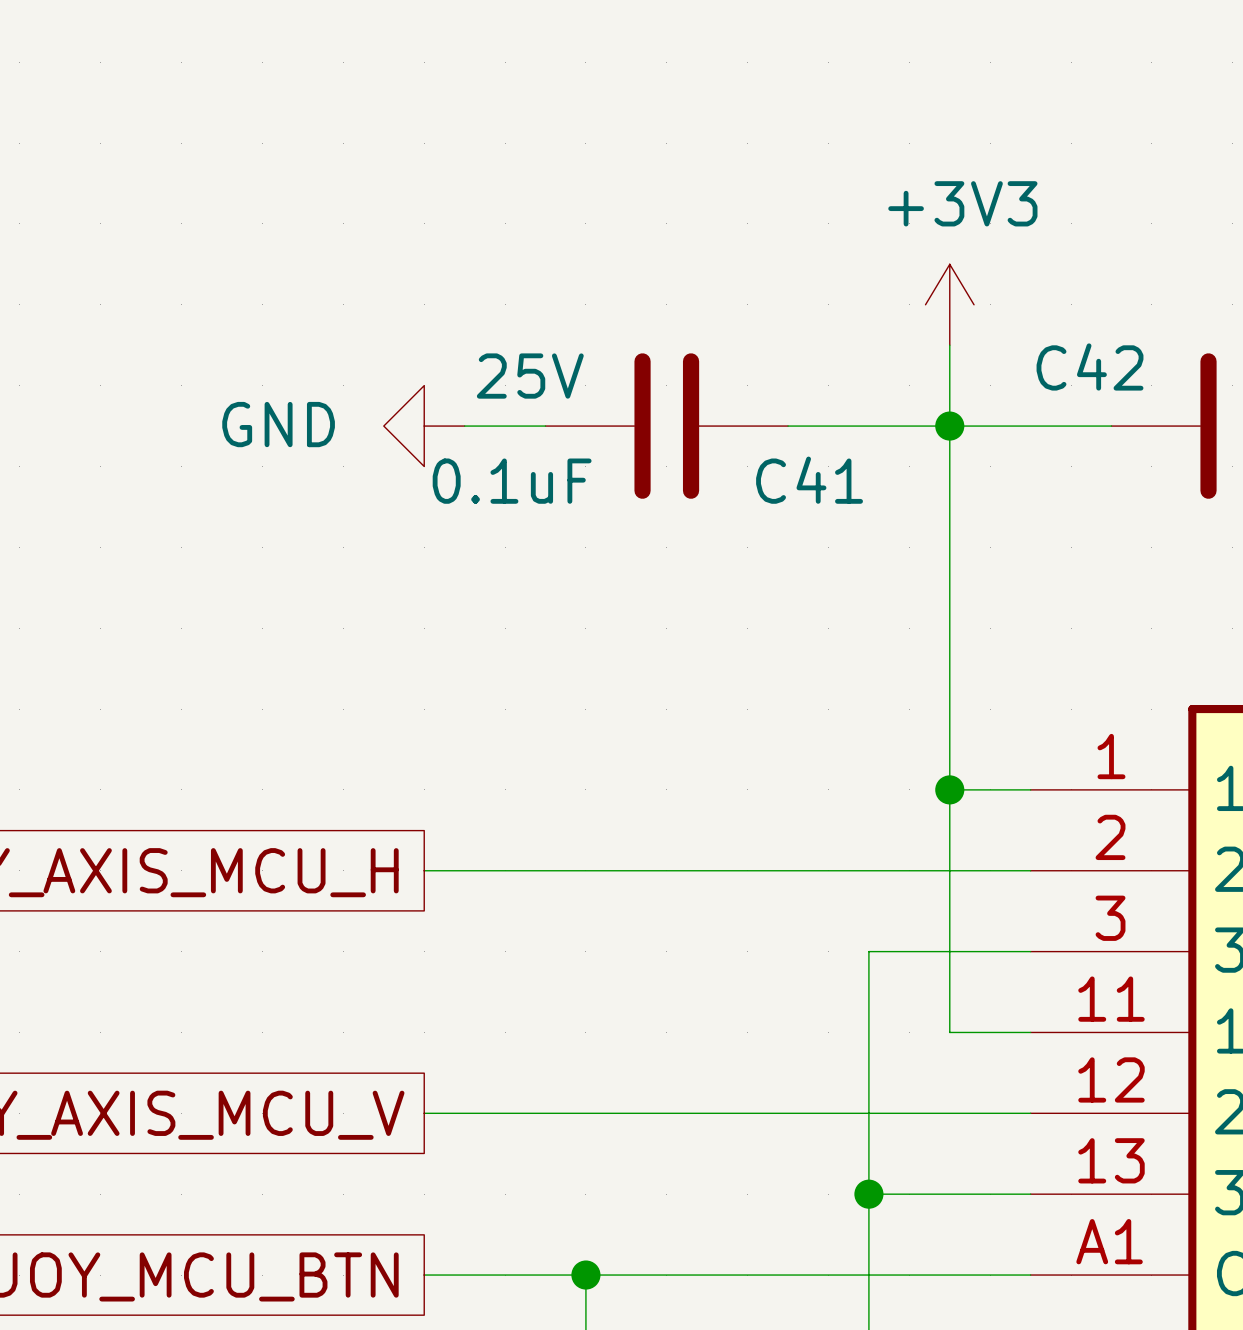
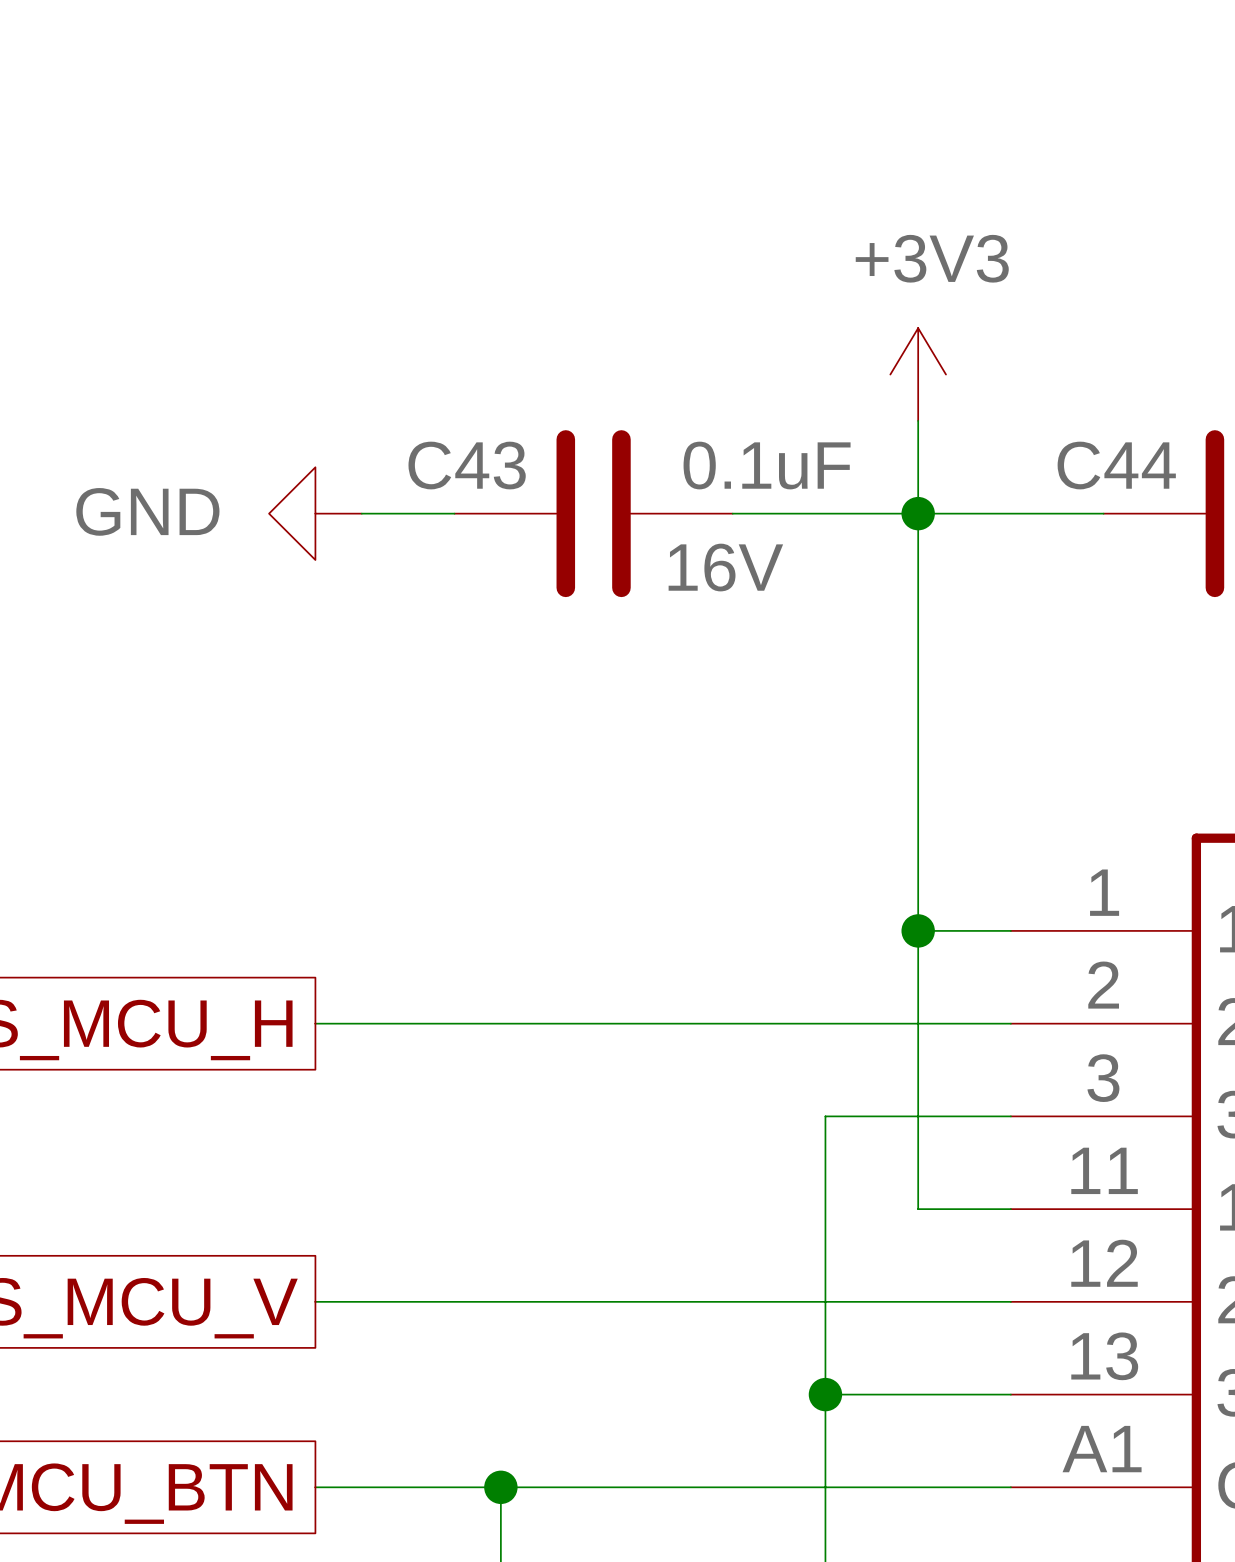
C42 name: C42 (1090, 366) -> C44 (1116, 465)
C41 text: 25V (530, 376) -> 16V (725, 567)
C41 name: C41 (809, 480) -> C43 (467, 465)
C41 value position: 0.1uF (512, 481) -> 0.1uF (767, 465)

